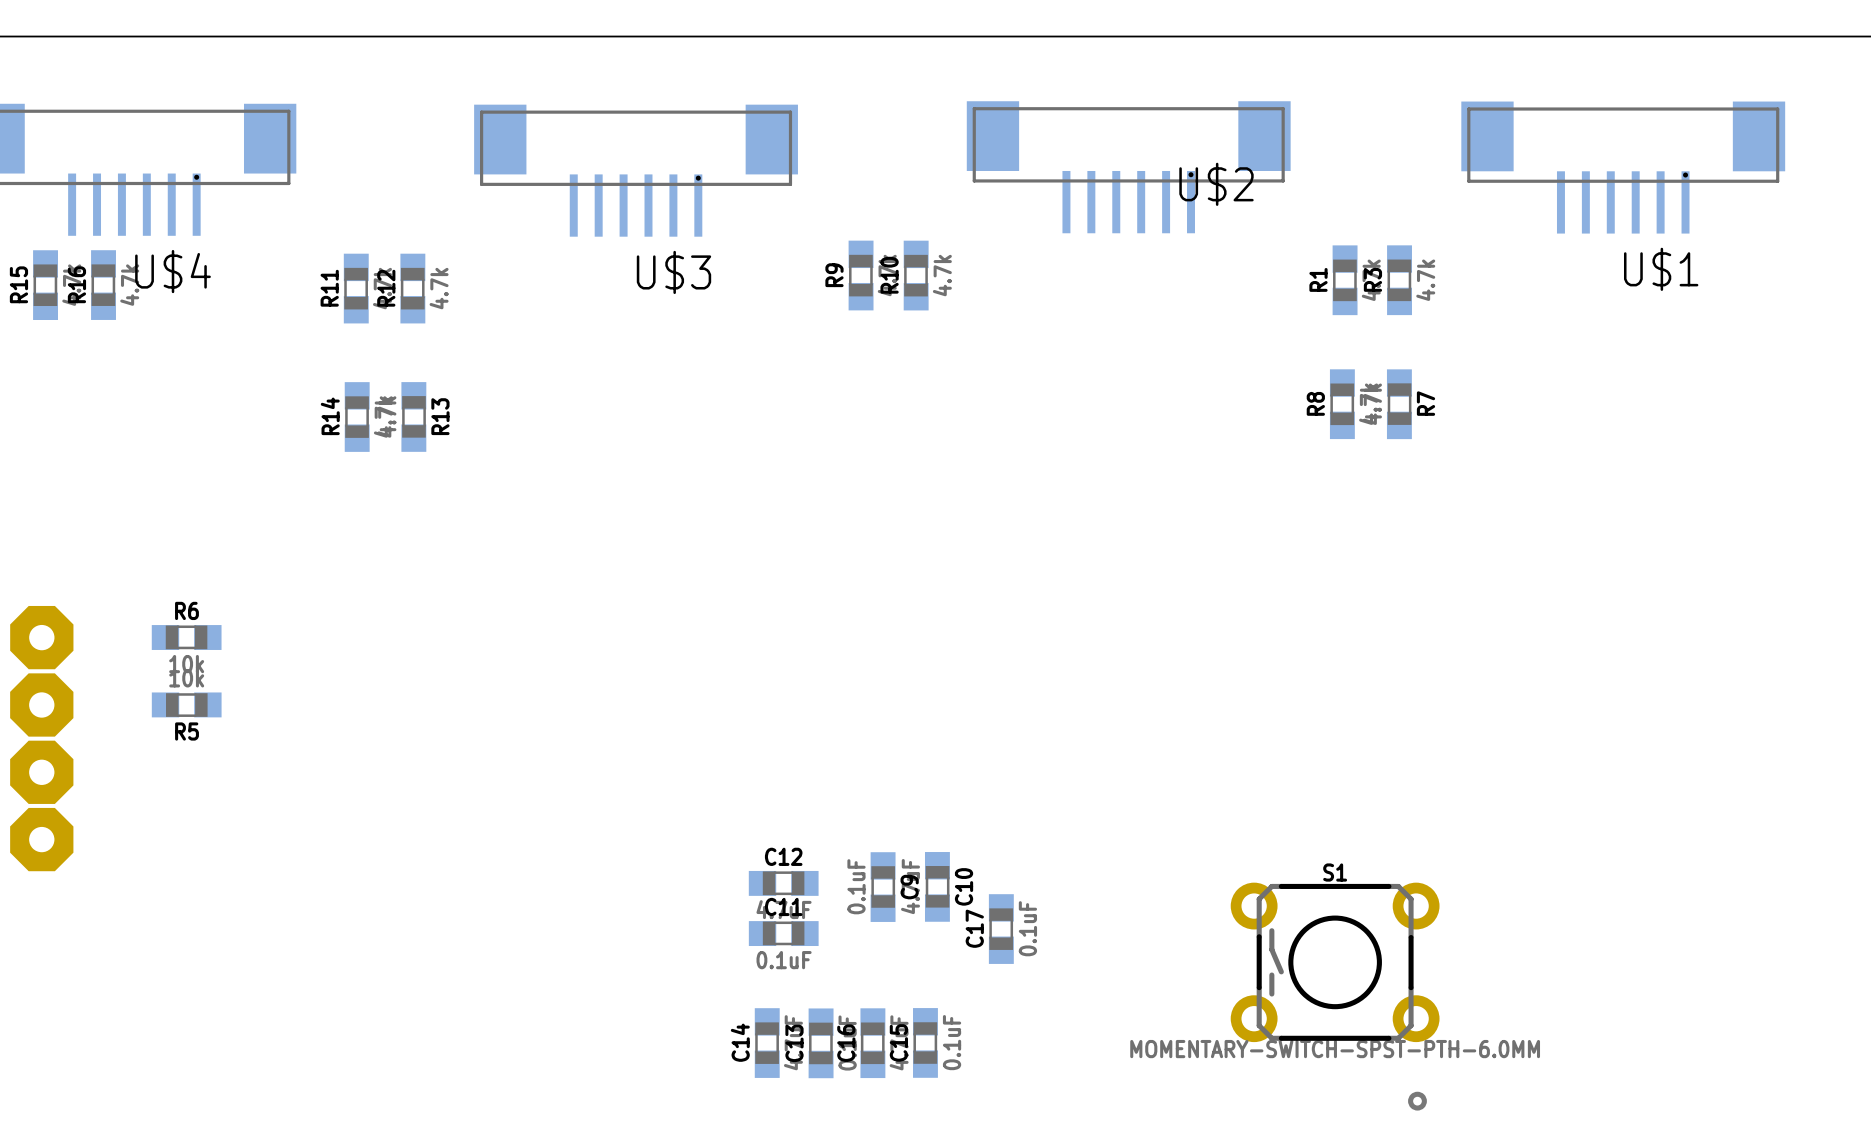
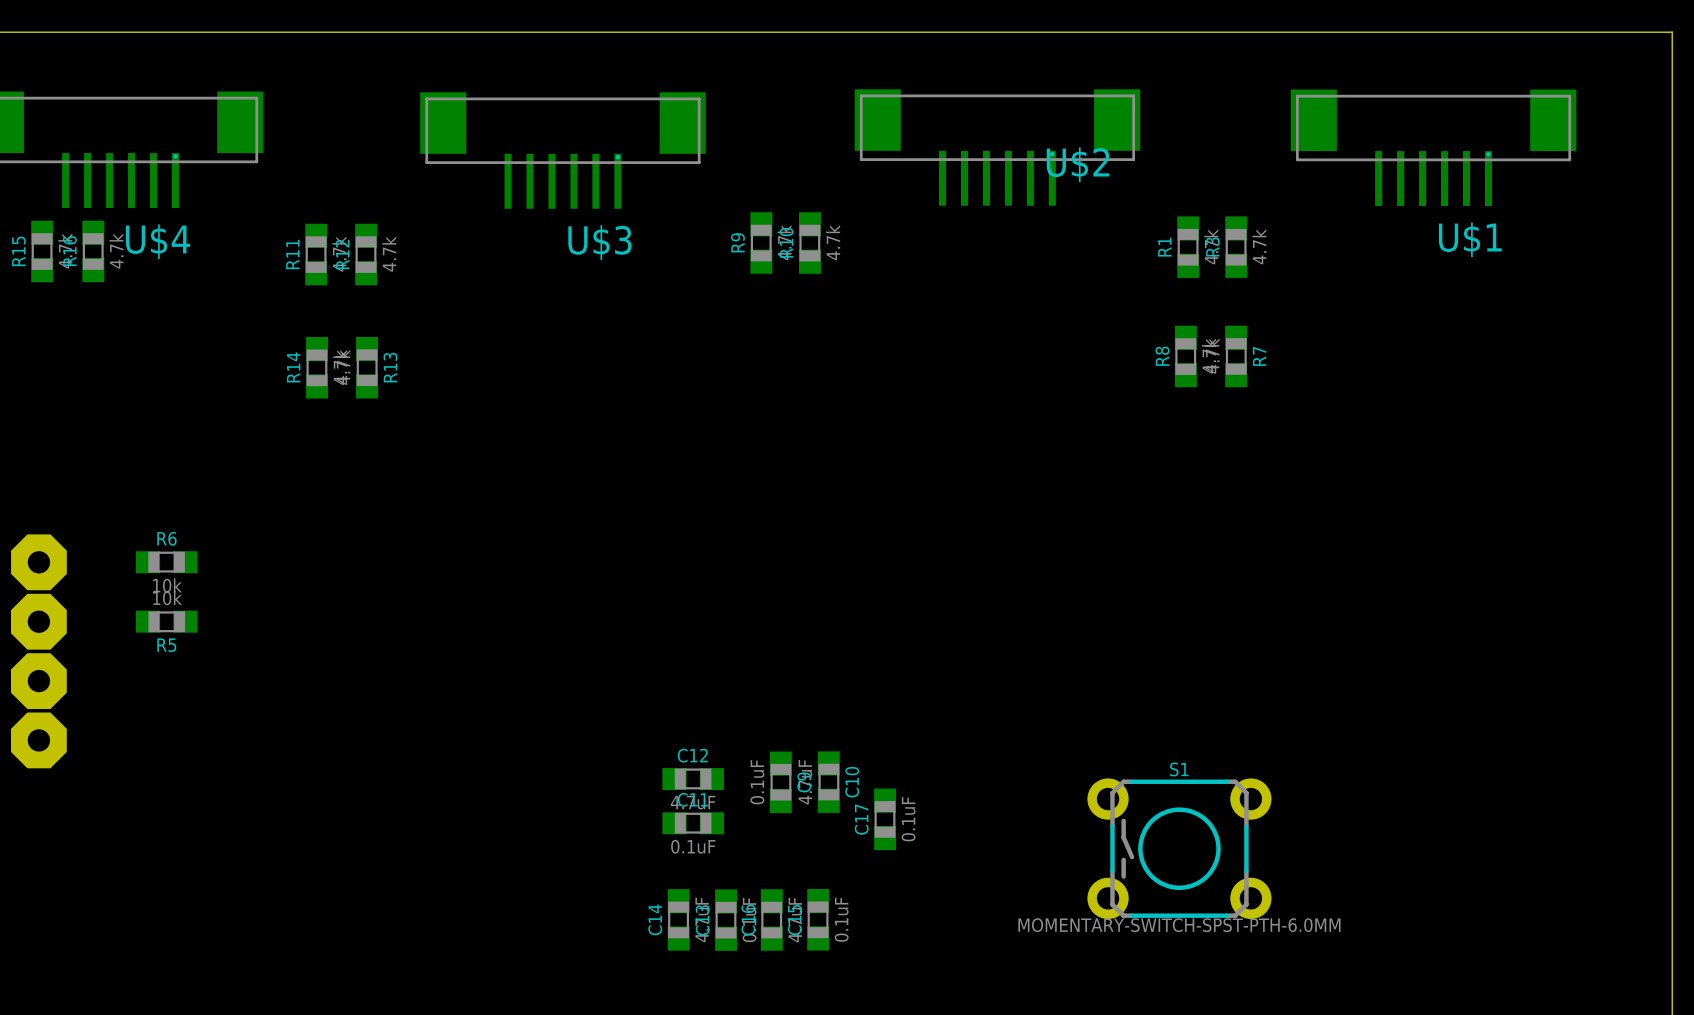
via: (1417, 1101) -> none

